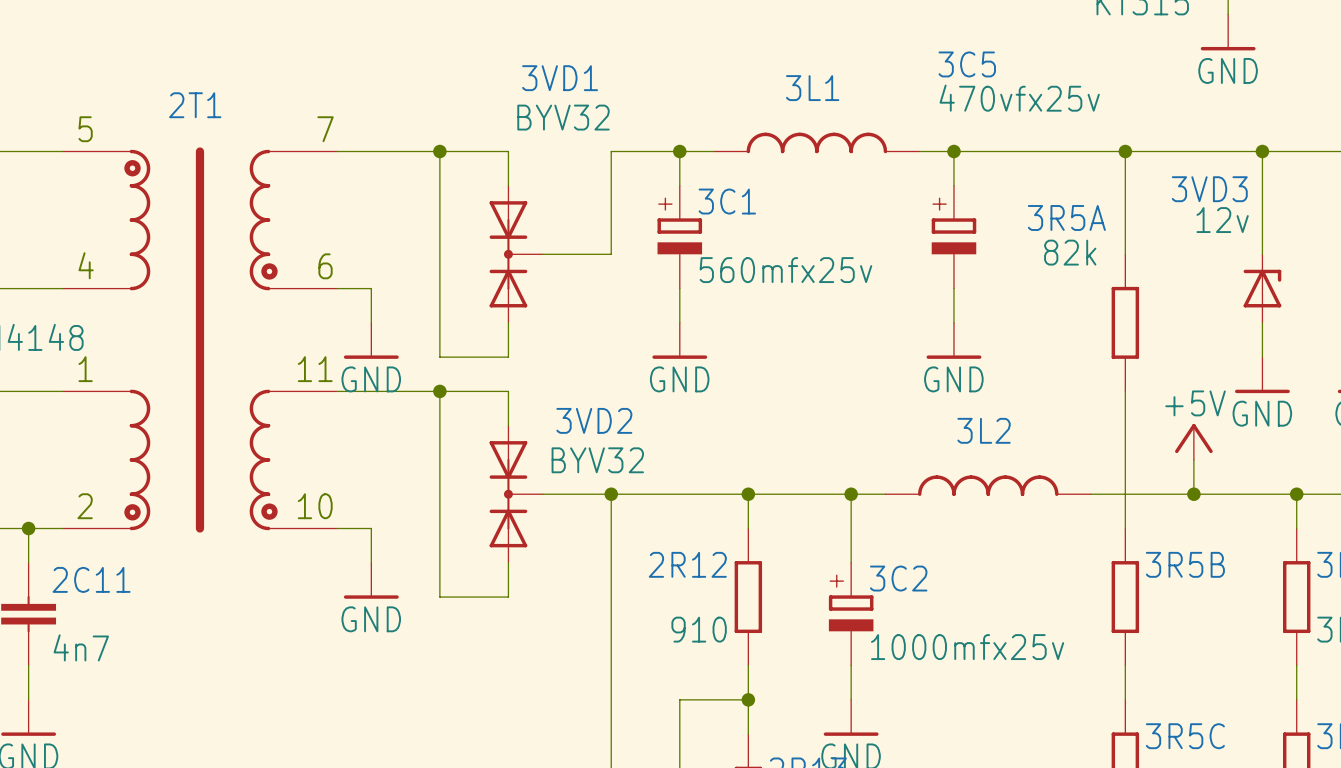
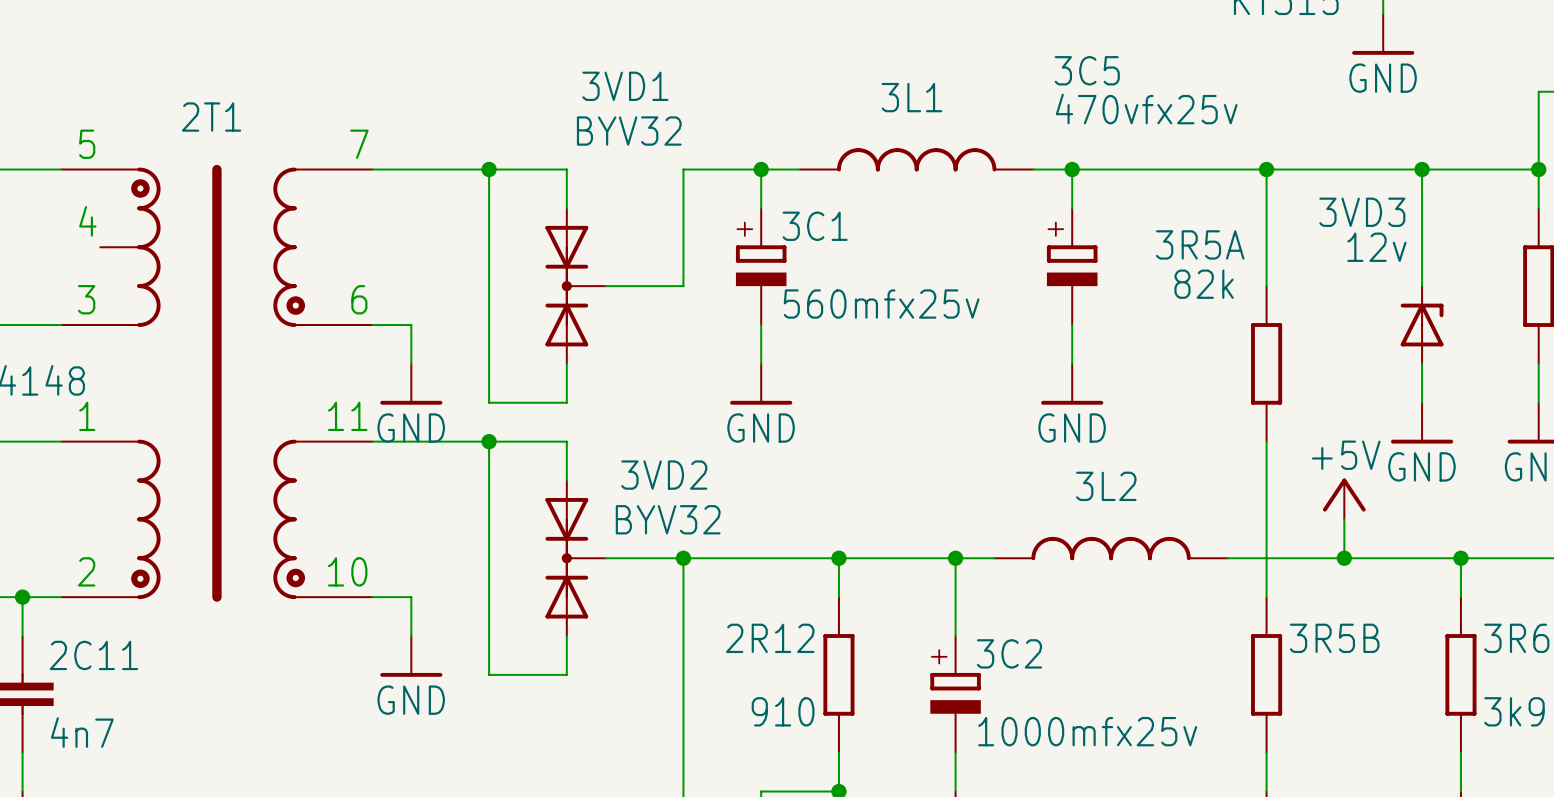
2T1 symbol: [62, 147, 338, 533] -> [61, 164, 373, 602]
text: none -> 4 (87, 221)
text: 4 (86, 265) -> 3 (86, 299)

